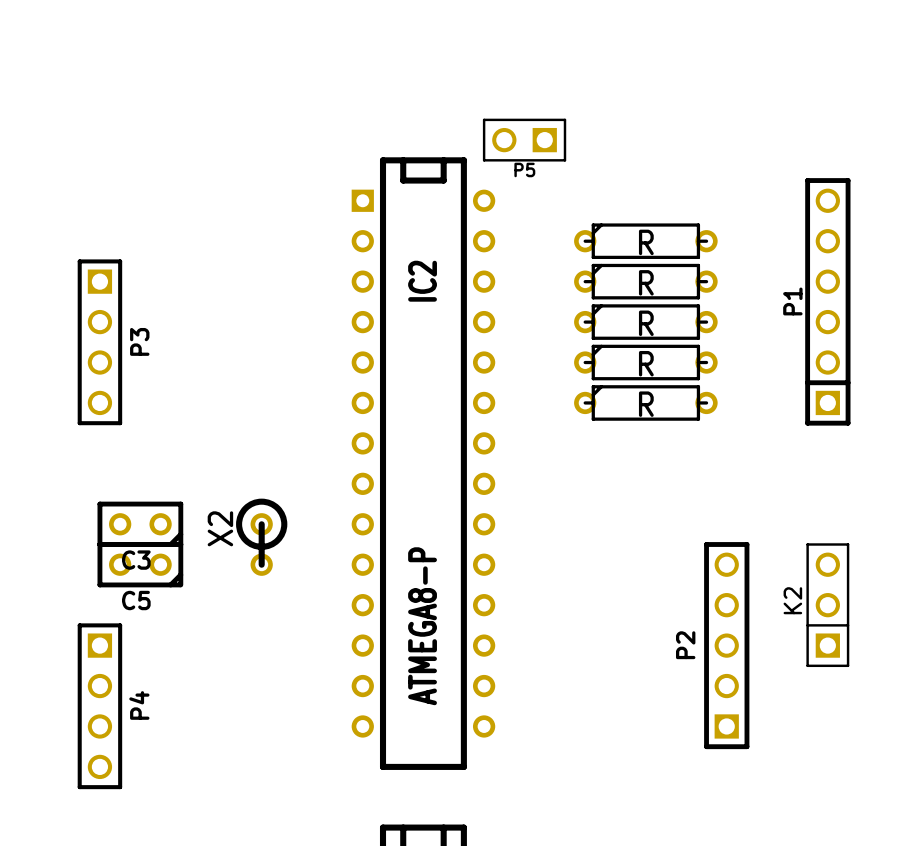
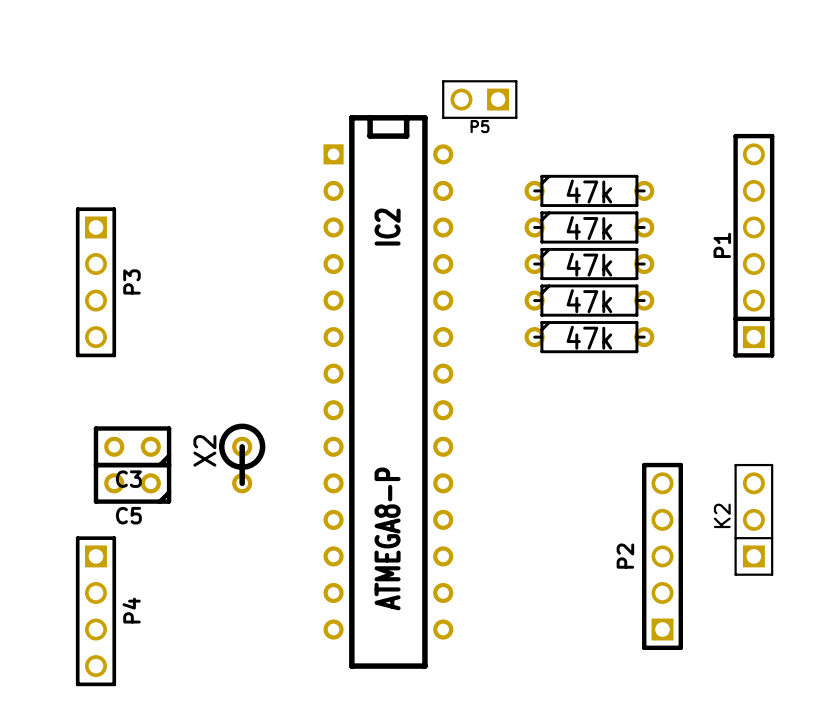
part value: R (646, 242) -> 47k (589, 191)
part value: R (646, 282) -> 47k (589, 228)
part value: R (646, 323) -> 47k (589, 264)
part value: R (646, 363) -> 47k (589, 301)
part value: R (646, 404) -> 47k (589, 337)

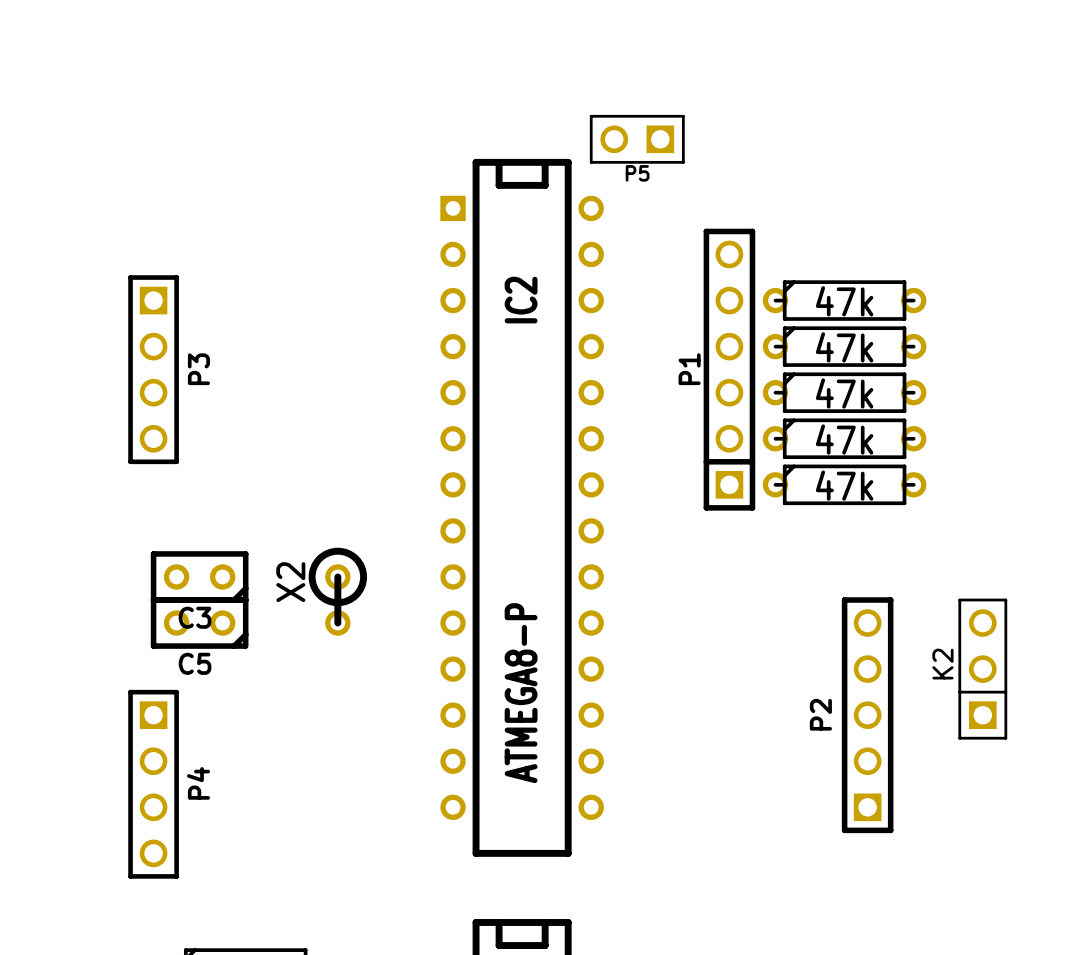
part: 47k (589, 190) -> none
part: 47k (589, 227) -> none
part: none -> 47k (844, 300)
P1 position: (753, 245) -> (729, 369)
part: 47k (589, 264) -> none
part: none -> 47k (844, 346)
part: 47k (589, 300) -> none
part: none -> 47k (844, 392)
part: 47k (589, 337) -> none
part: none -> 47k (844, 438)
part: none -> 47k (844, 484)

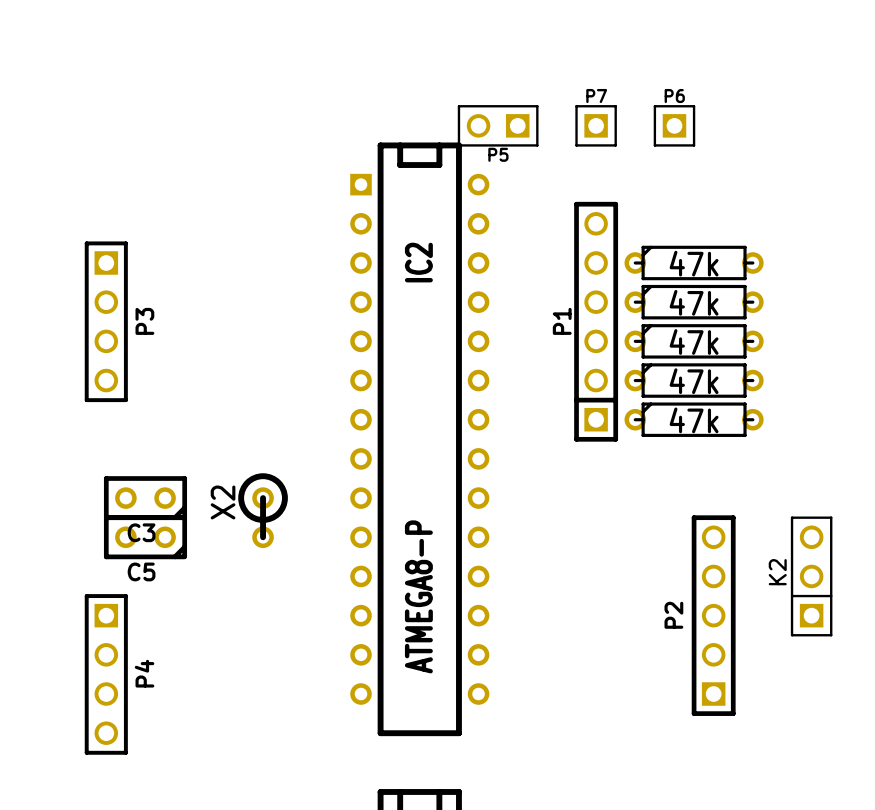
P5 position: (637, 139) -> (498, 125)
P7: none -> (596, 125)
P6: none -> (674, 125)

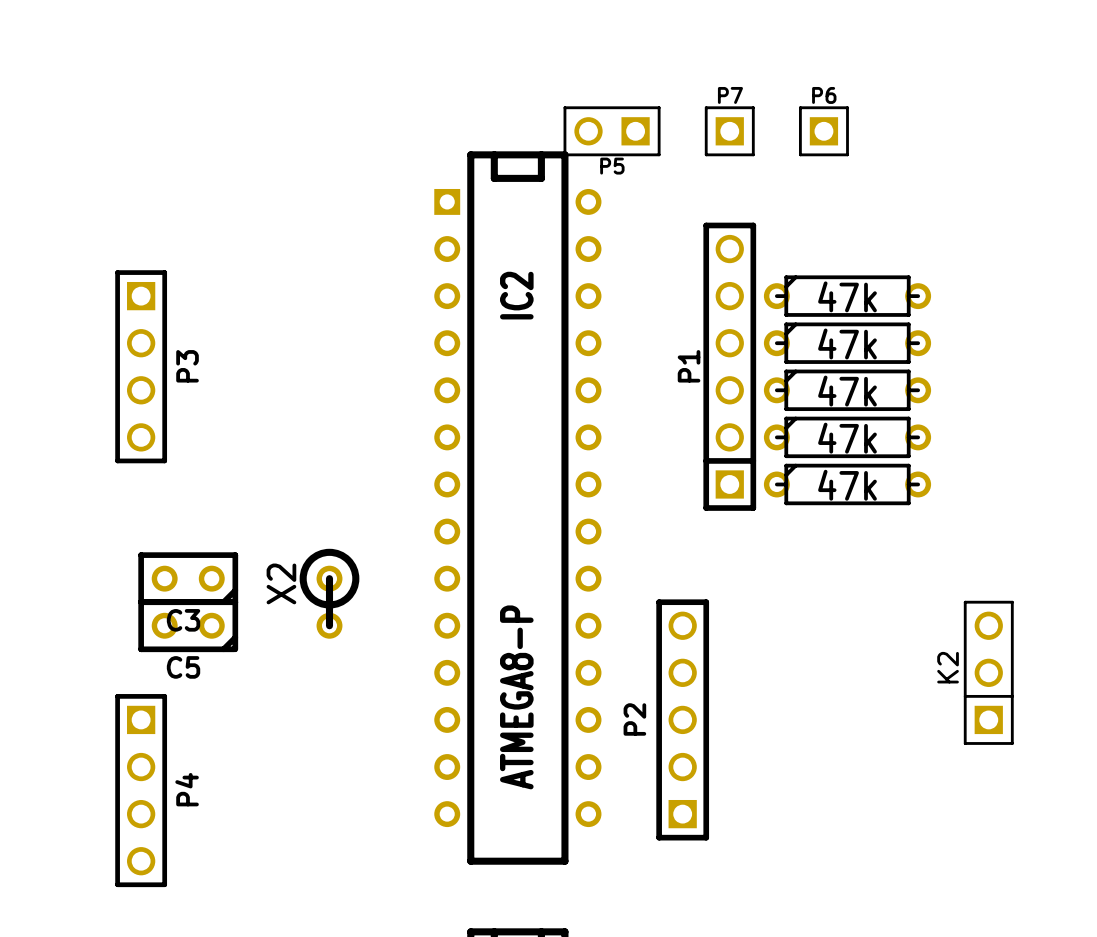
P2 position: (713, 615) -> (682, 719)

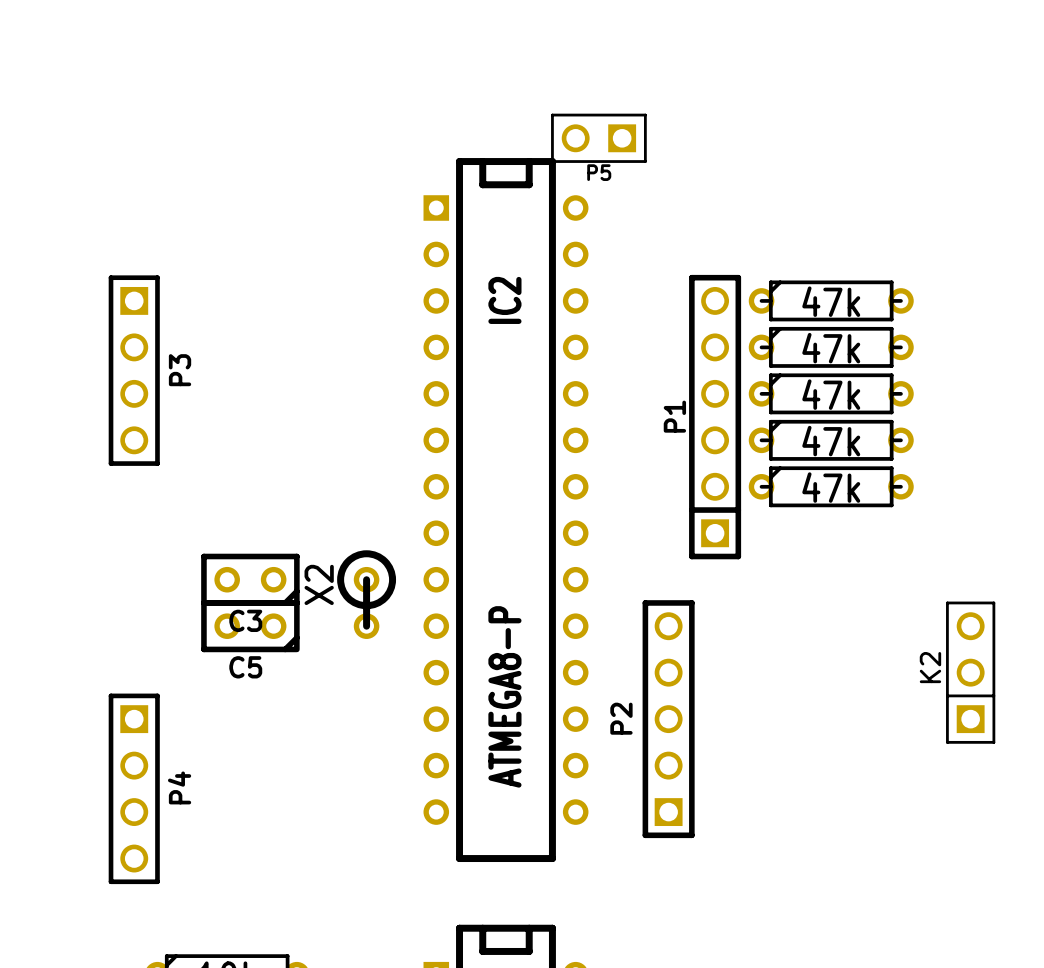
P7: (729, 131) -> none
P6: (823, 131) -> none
P1 position: (729, 366) -> (715, 417)
C3 position: (188, 578) -> (250, 579)
X2 position: (329, 593) -> (366, 594)
C5 position: (188, 625) -> (250, 626)

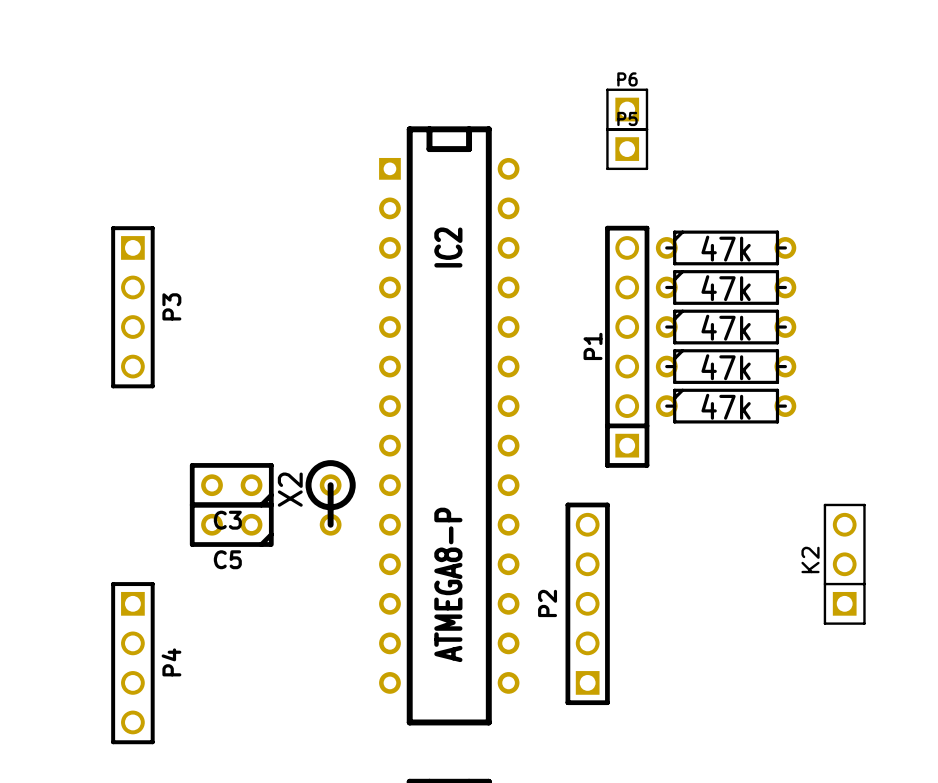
P5 footprint: [551, 113, 647, 163] -> [606, 128, 649, 171]
P6: none -> (627, 109)
P5 name position: P5 (599, 172) -> P5 (627, 118)

